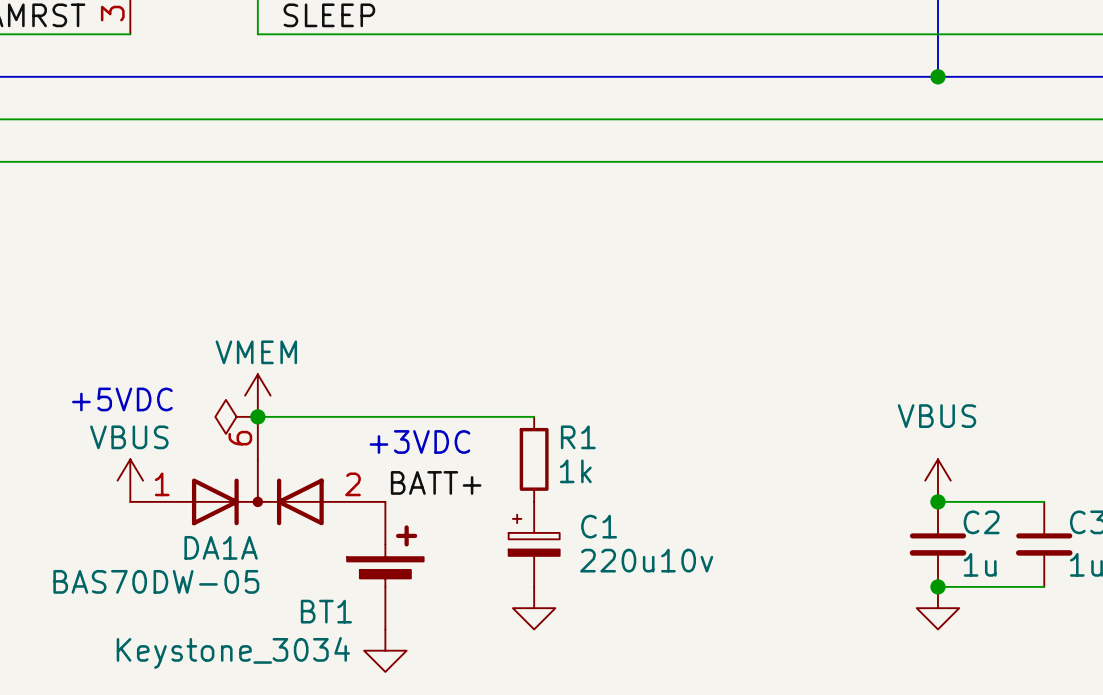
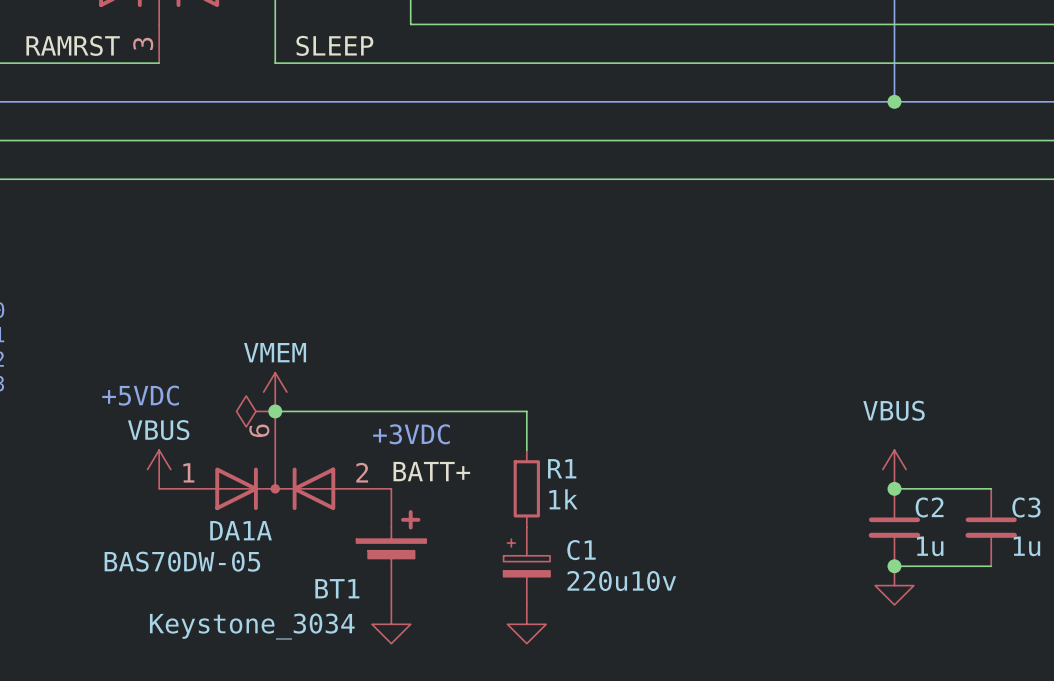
wire: none -> (526, 411) (526, 450)
R1 position: (534, 459) -> (526, 488)
C1 position: (534, 544) -> (526, 566)
power symbol position: (534, 608) -> (526, 624)

